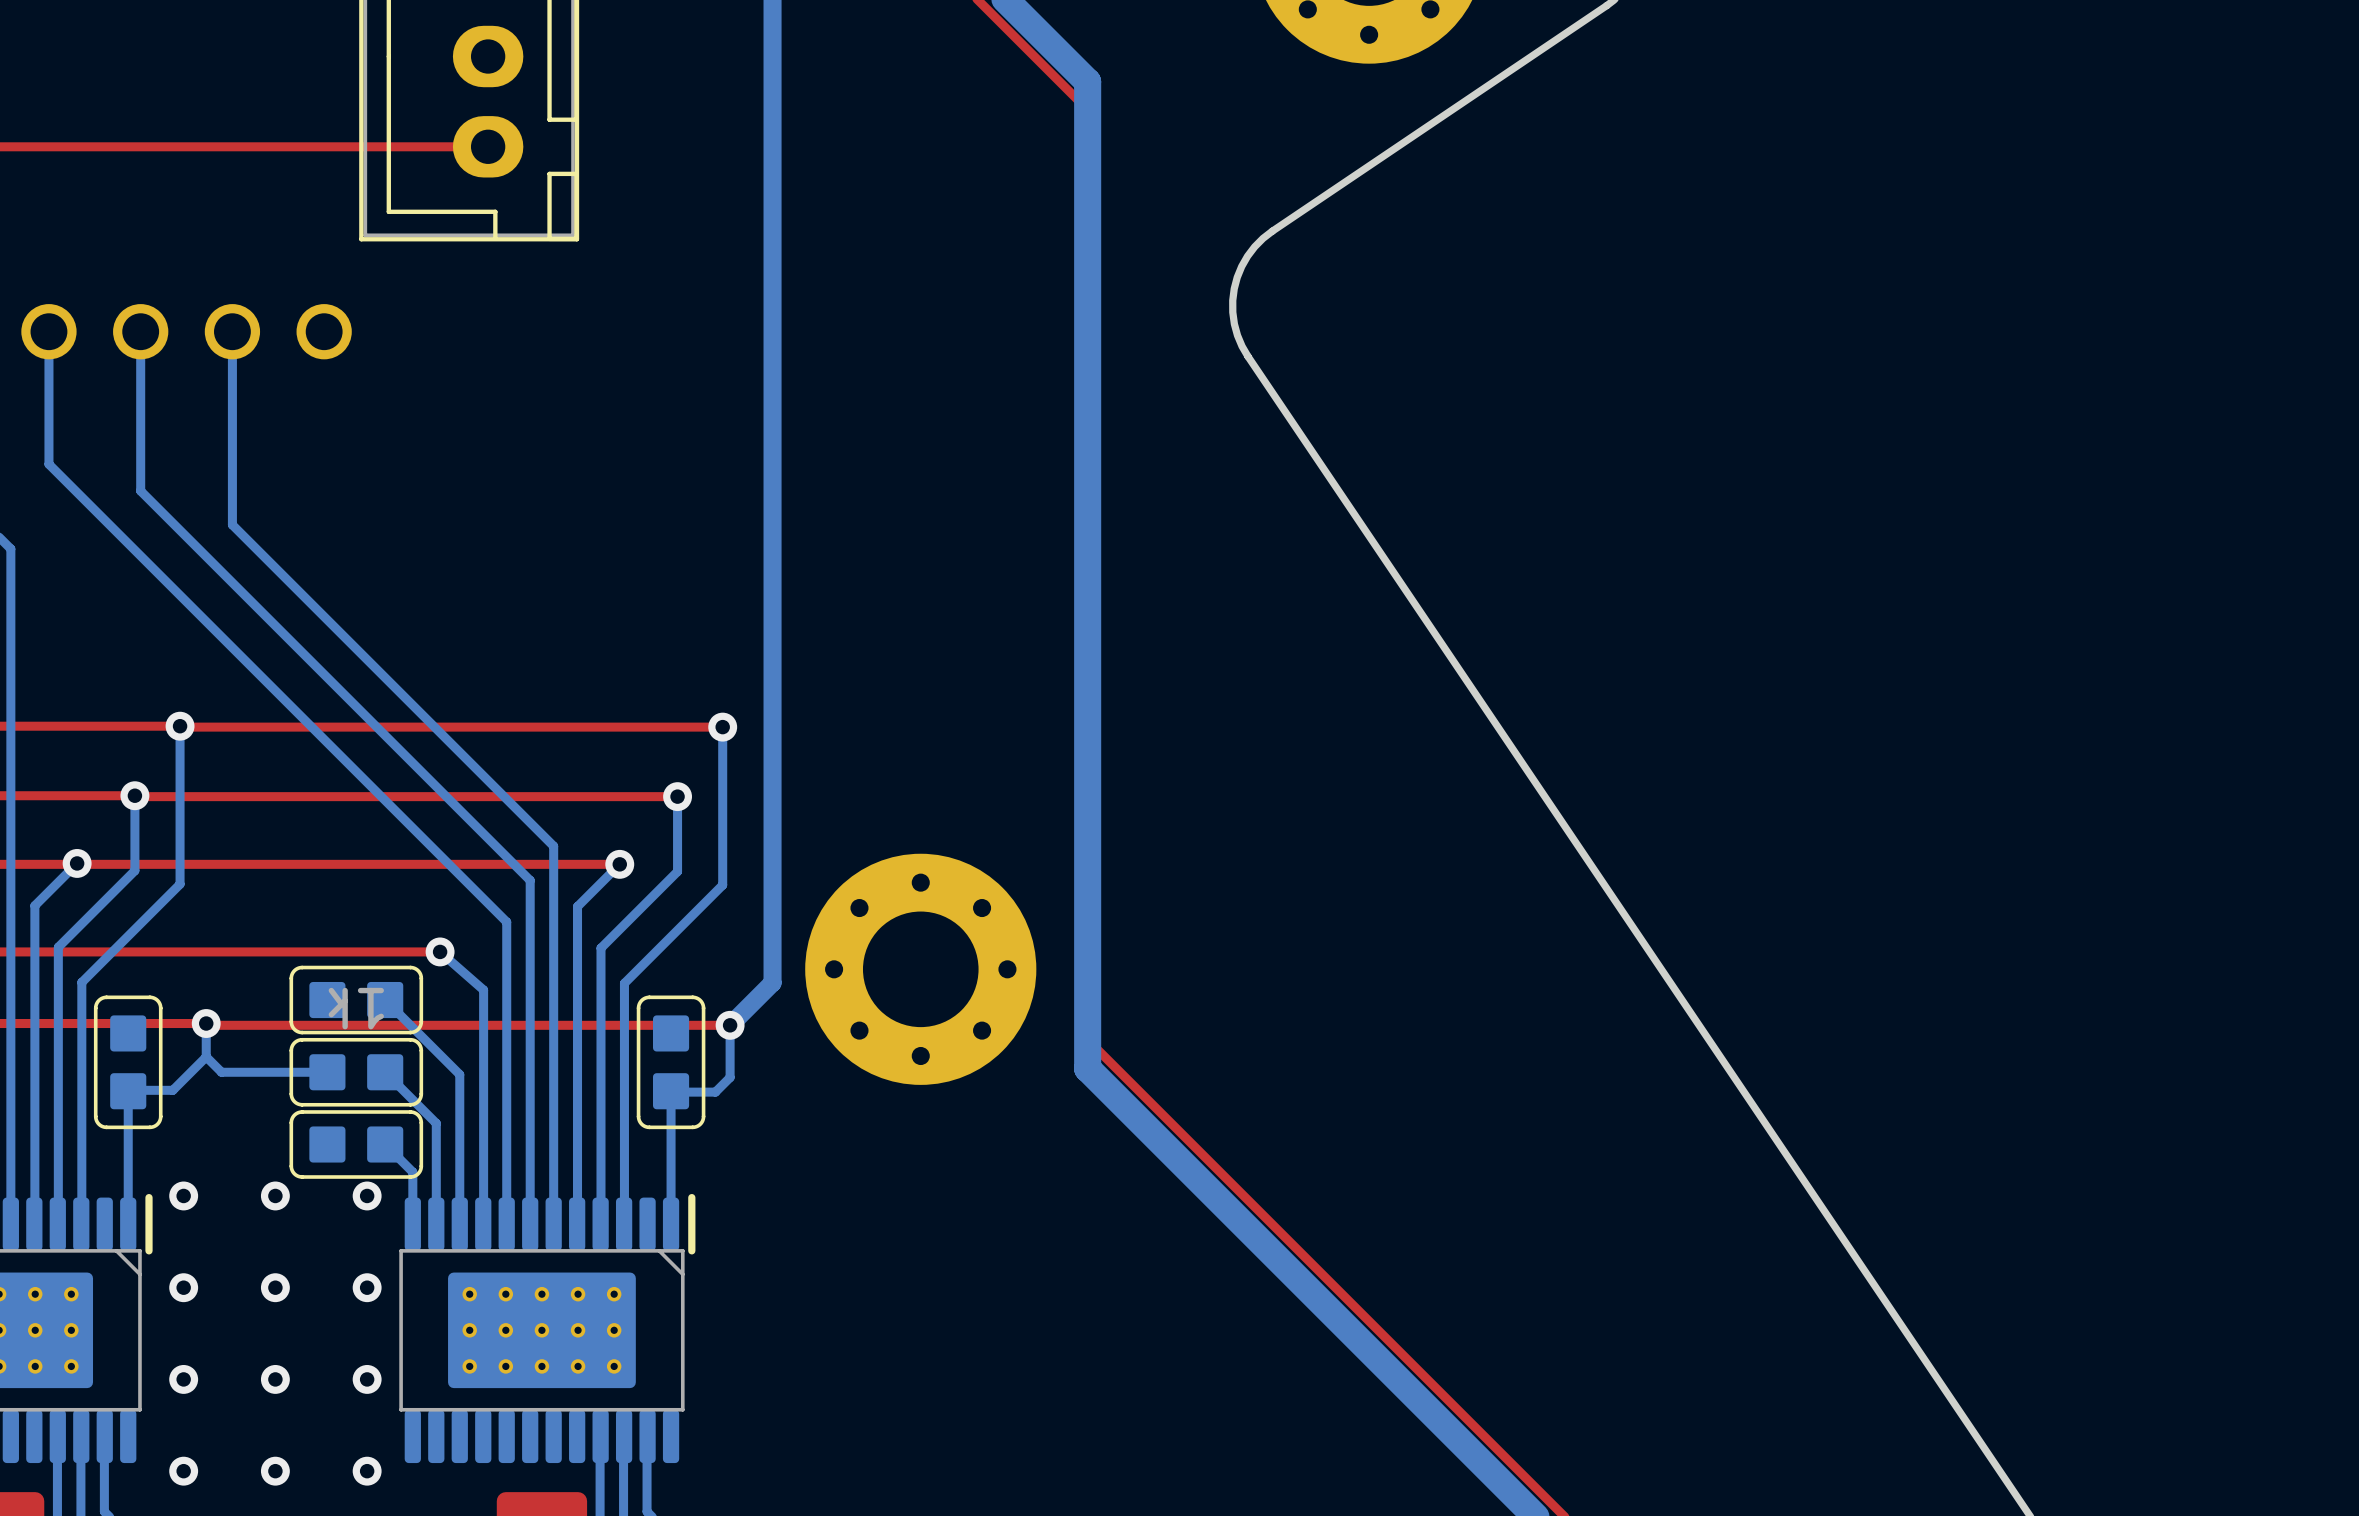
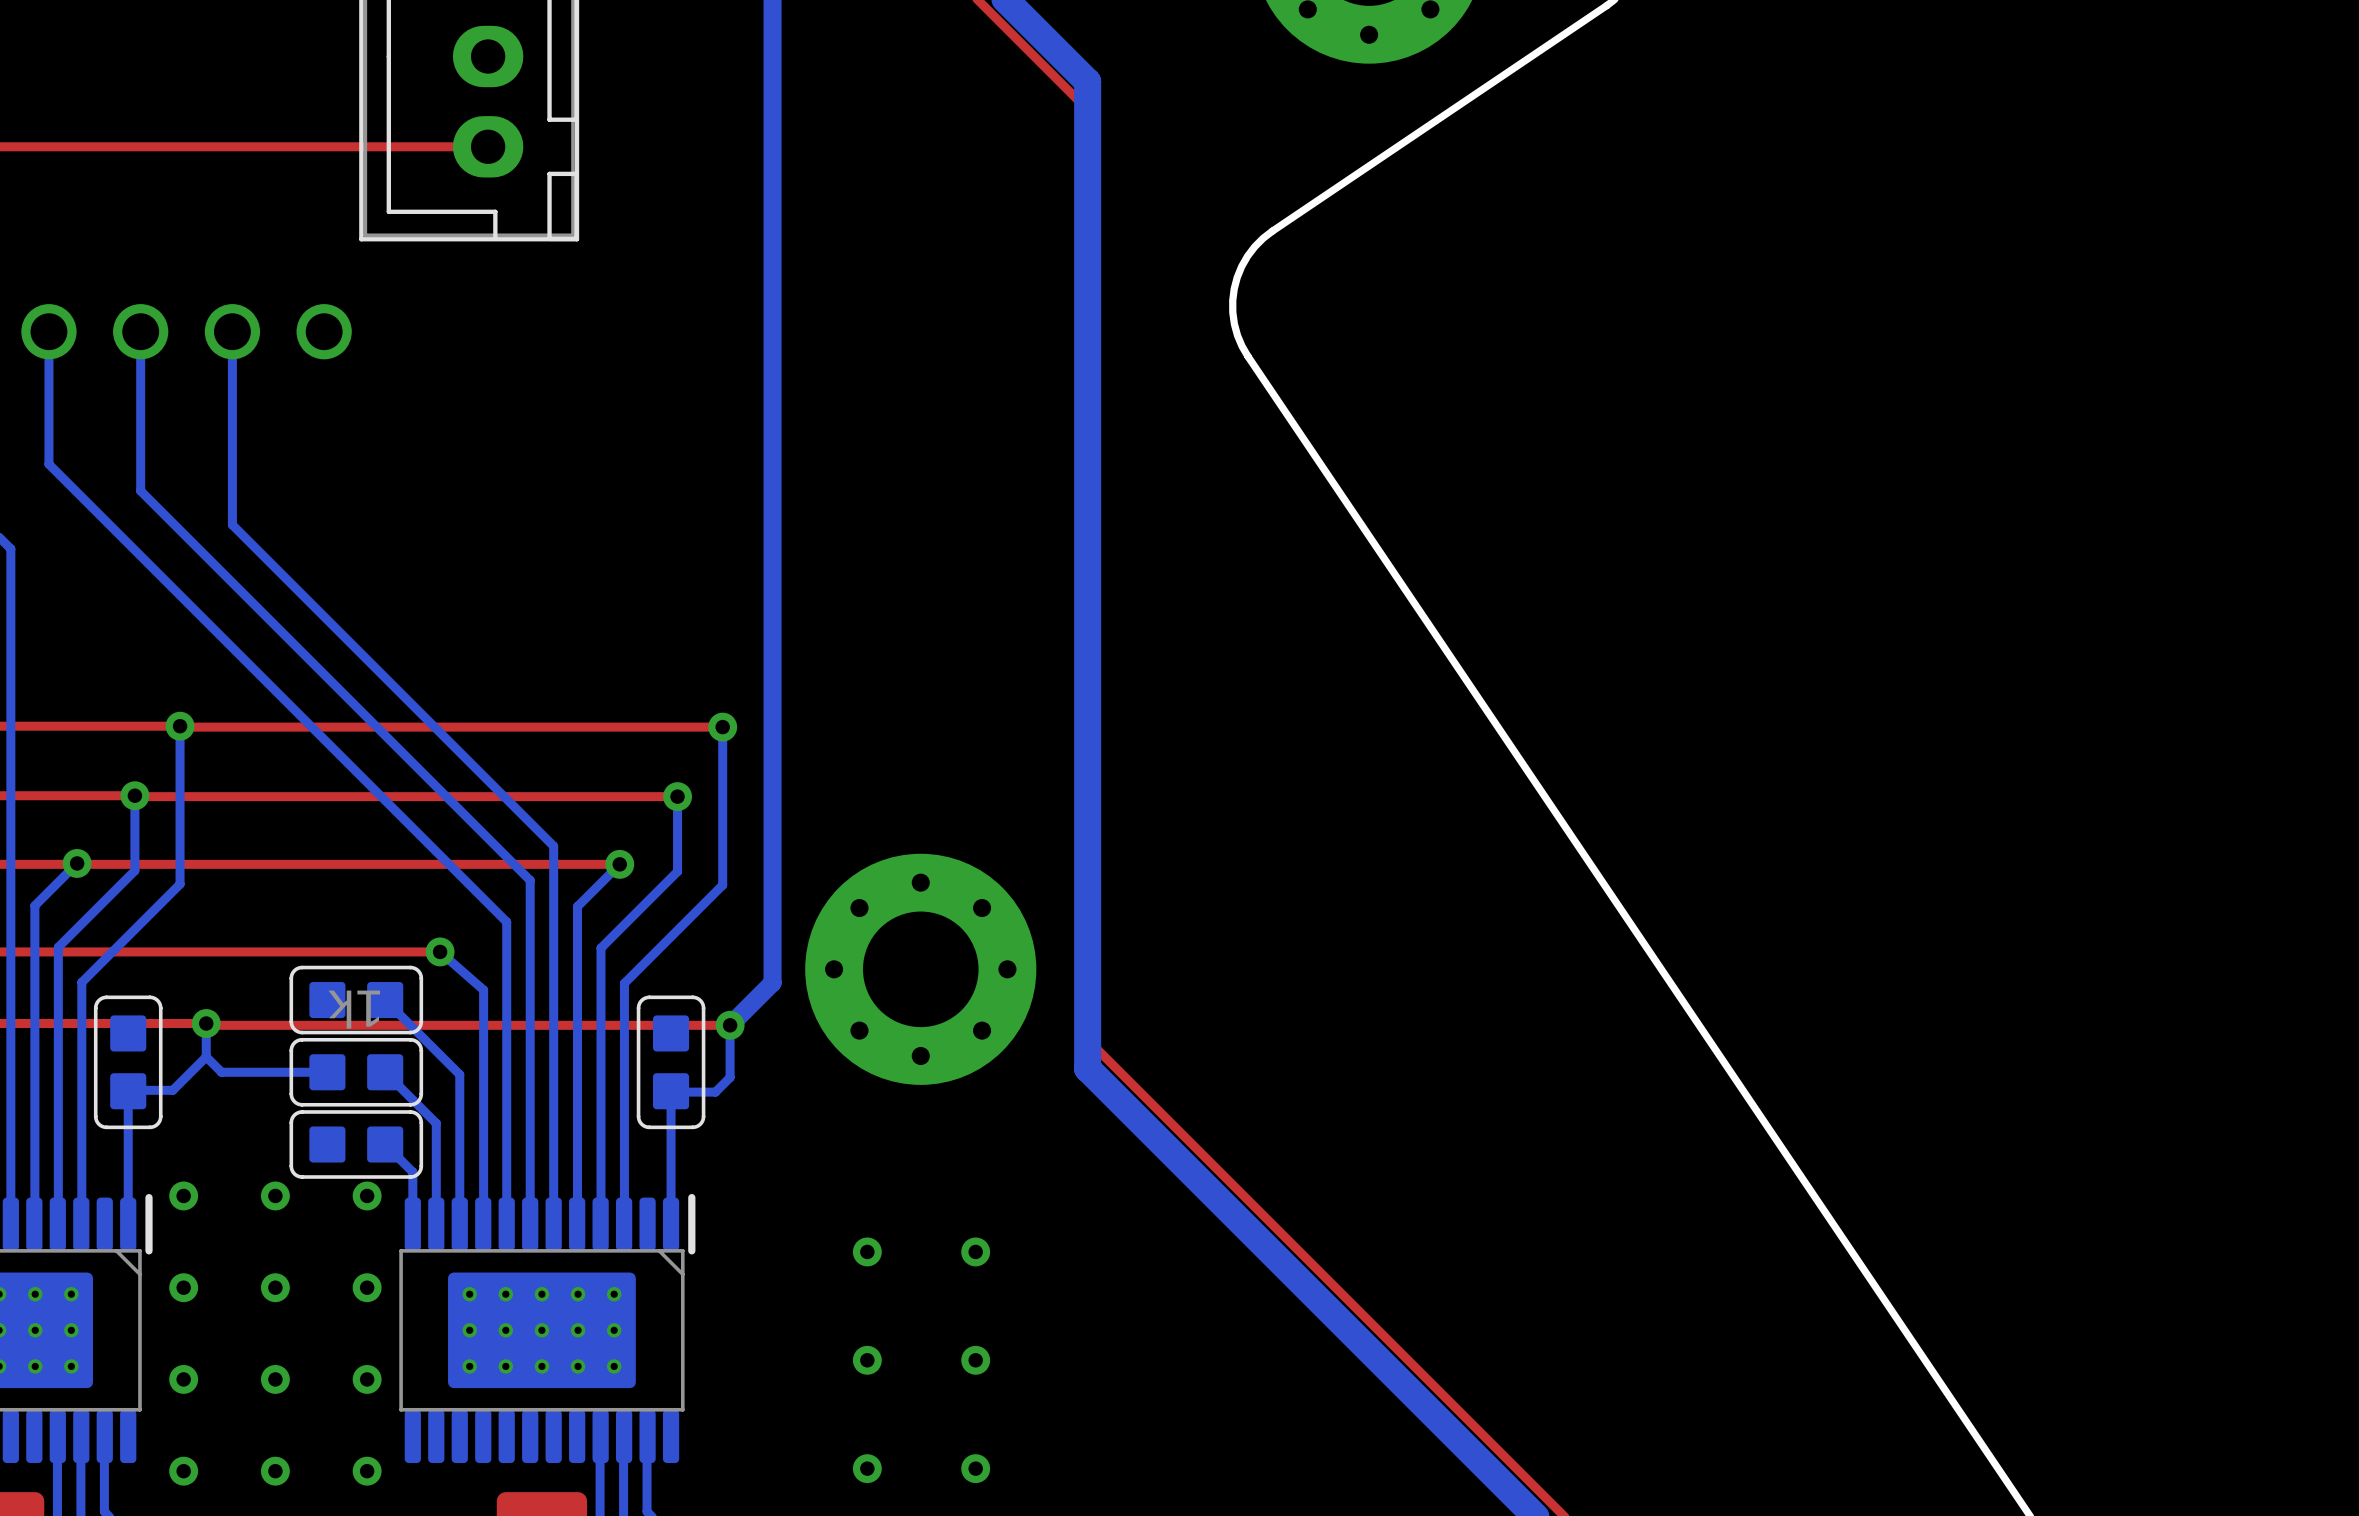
via: none -> (867, 1251)
via: none -> (975, 1251)
via: none -> (867, 1360)
via: none -> (975, 1360)
via: none -> (867, 1468)
via: none -> (975, 1468)

